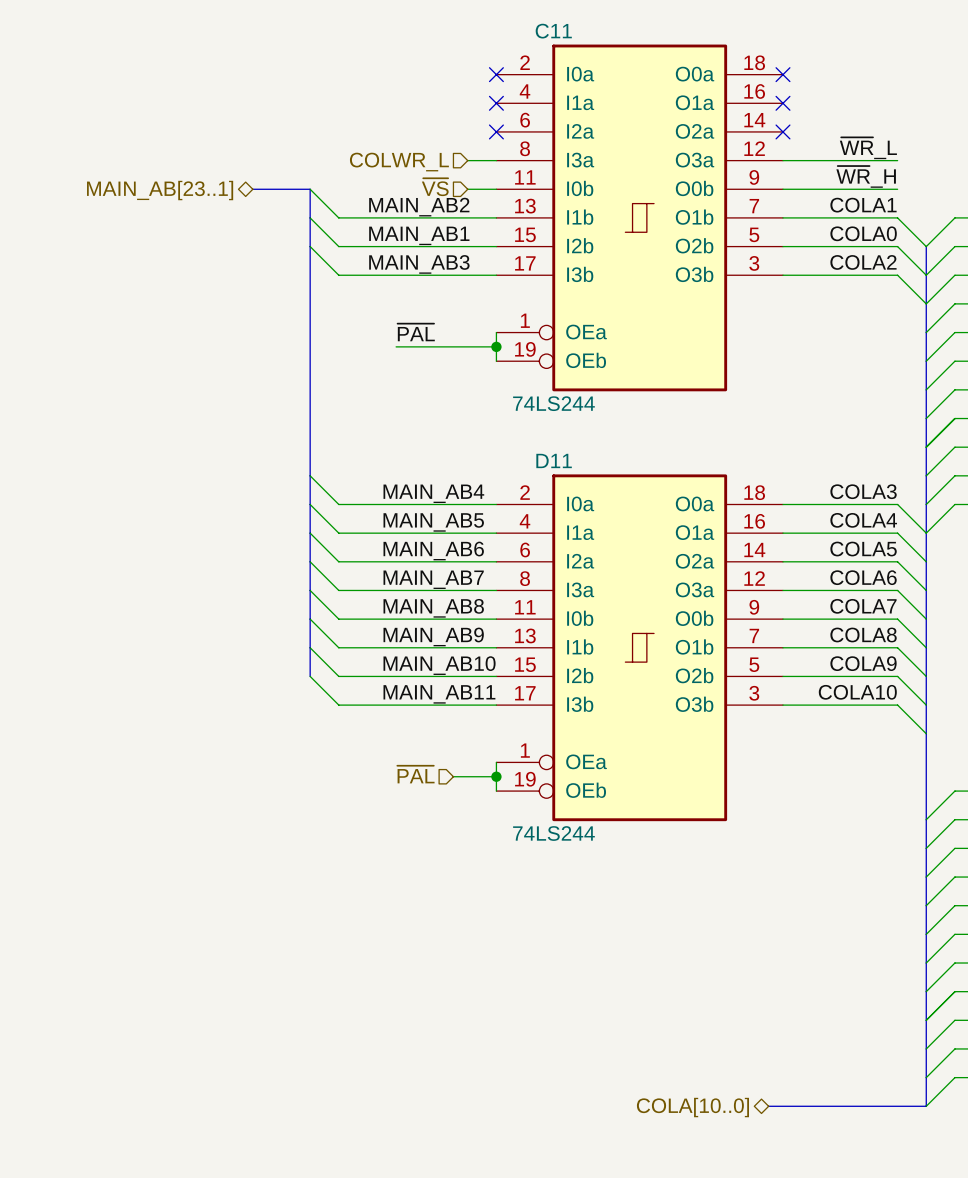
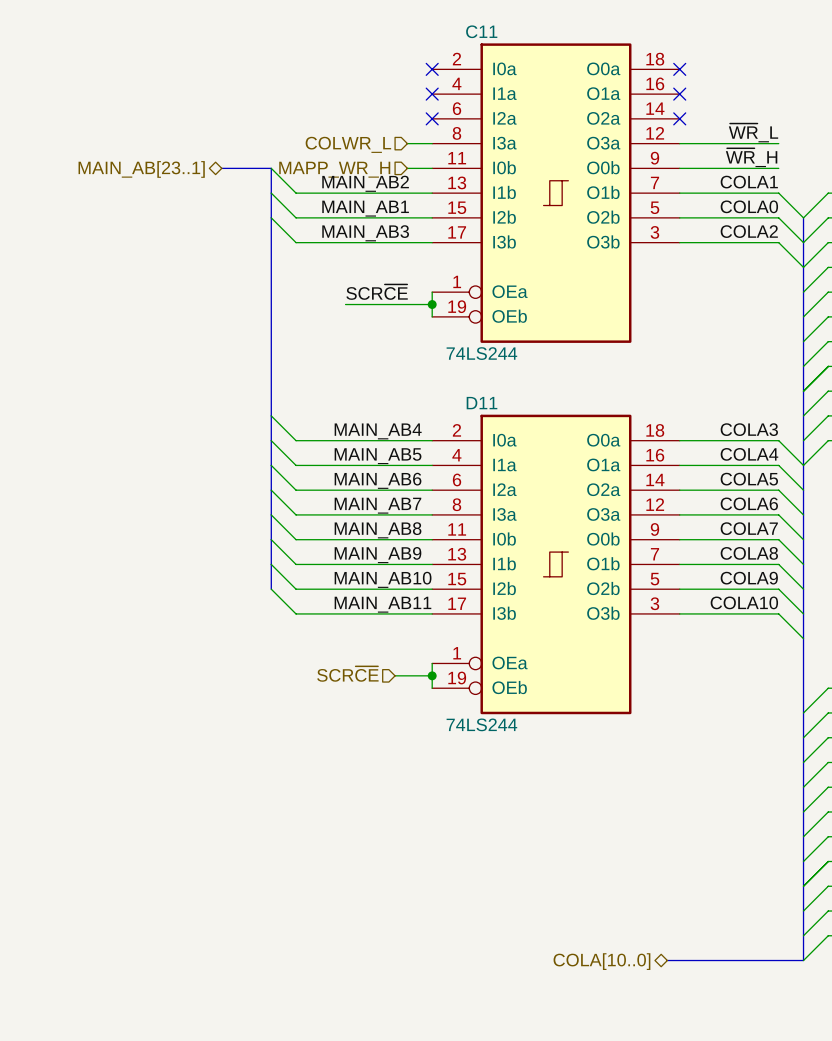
hierarchical label: ~{VS} (435, 187) -> MAPP_WR_H (334, 169)
label: ~{PAL} (416, 332) -> SCR~{CE} (377, 292)
hierarchical label: ~{PAL} (415, 774) -> SCR~{CE} (347, 674)

